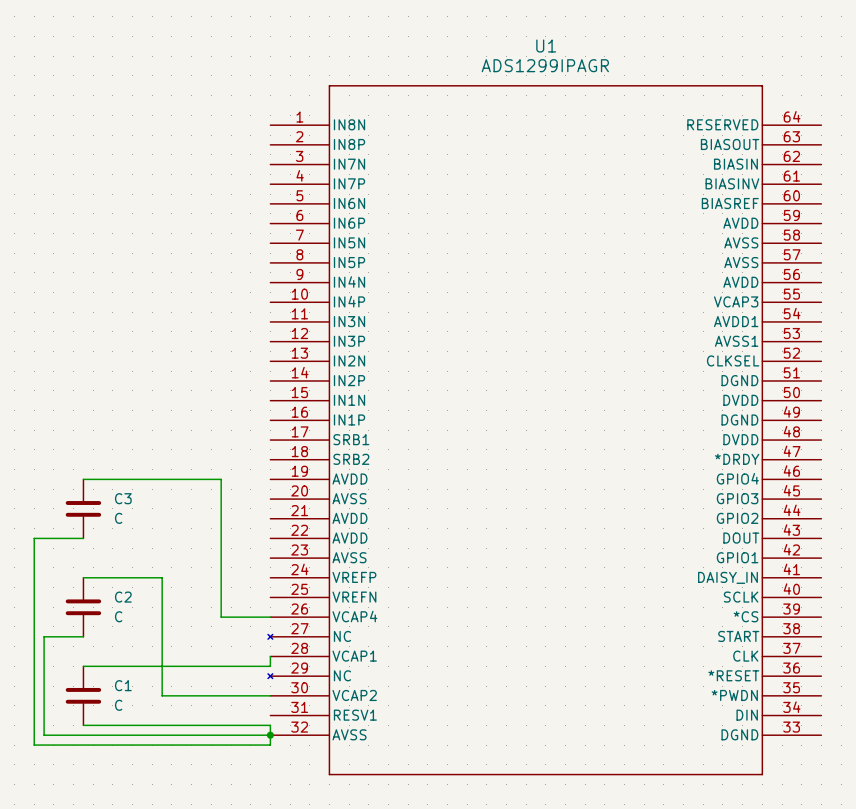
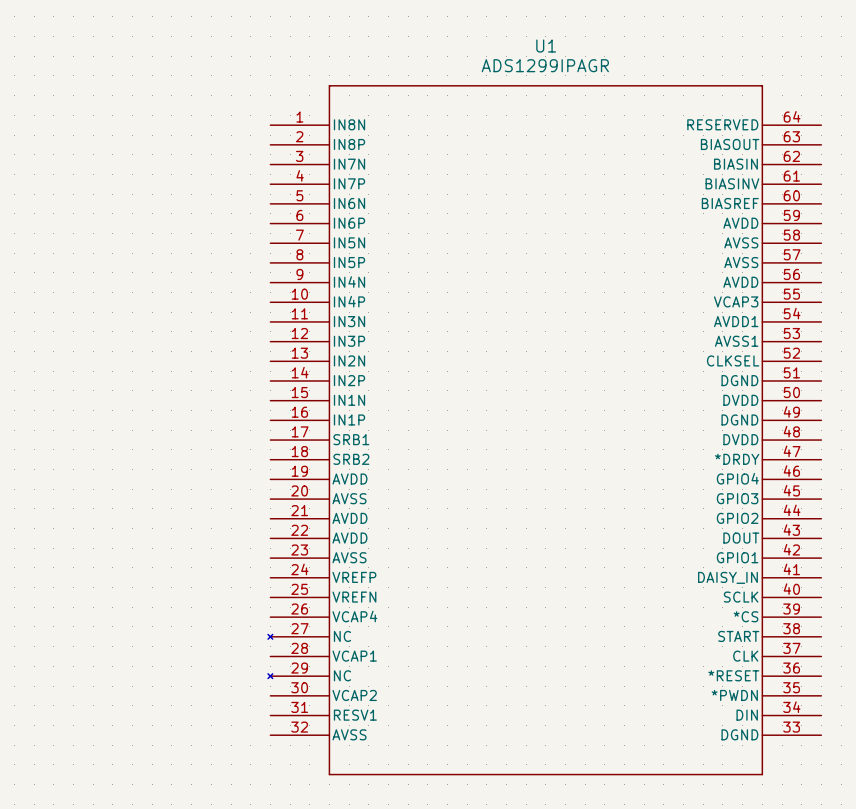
wire: (83, 479) (221, 479) (221, 617) (270, 617) -> none
C3: C (83, 508) -> none
wire: (83, 538) (34, 538) (34, 745) (270, 745) (270, 725) (83, 725) -> none
wire: (83, 577) (162, 577) (162, 695) (270, 695) -> none
C2: C (83, 607) -> none
wire: (83, 636) (44, 636) (44, 735) (270, 735) -> none
wire: (270, 656) (270, 666) (83, 666) -> none
C1: C (83, 695) -> none
junction: (270, 735) -> none

